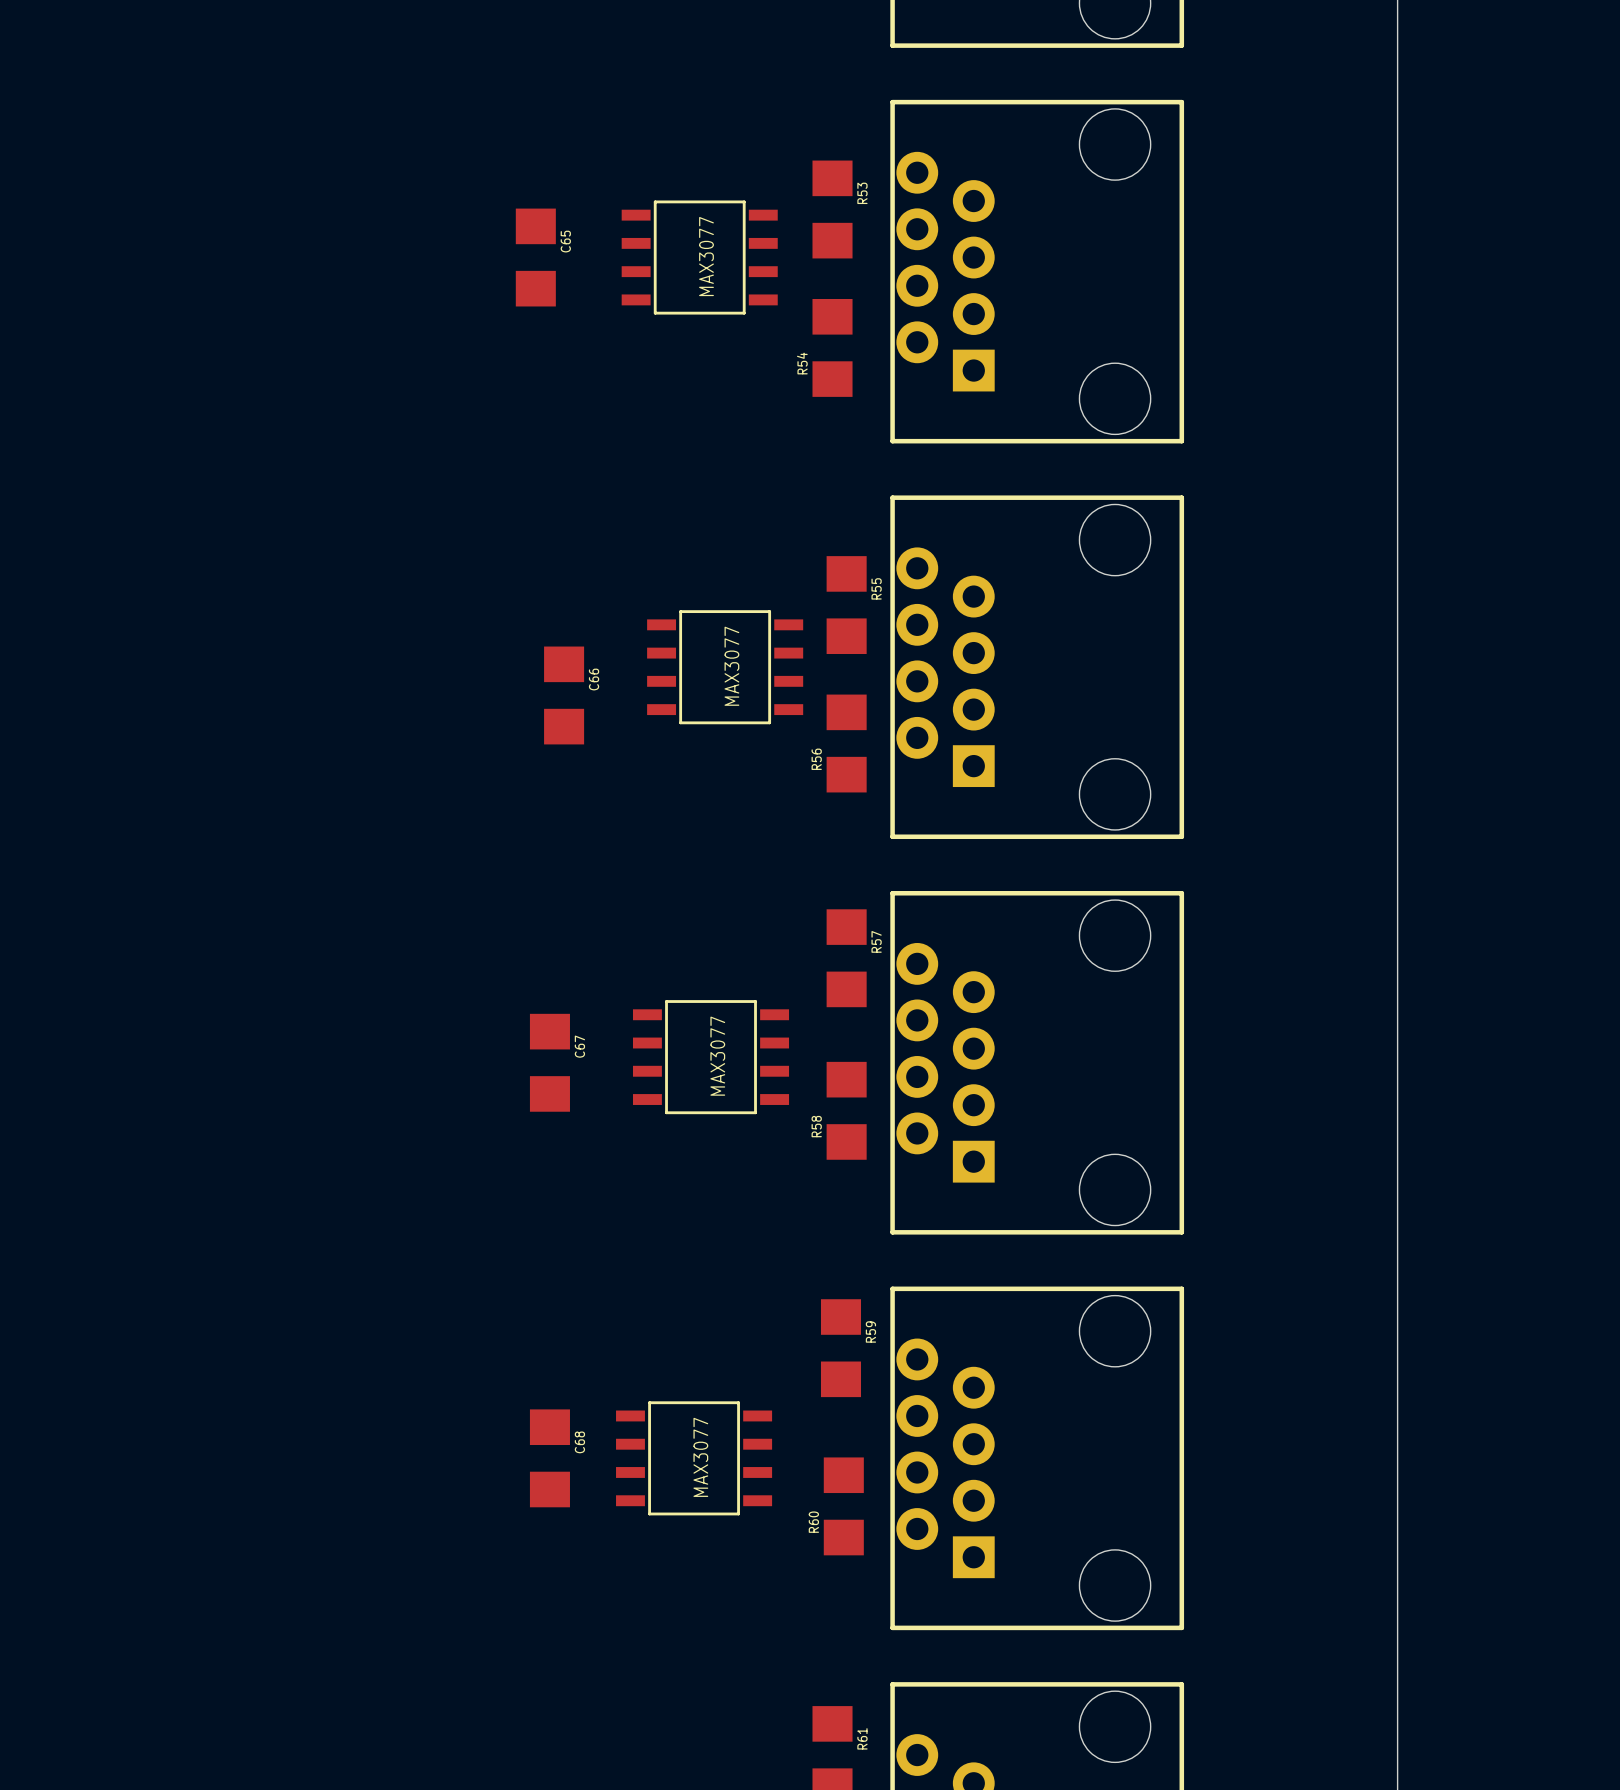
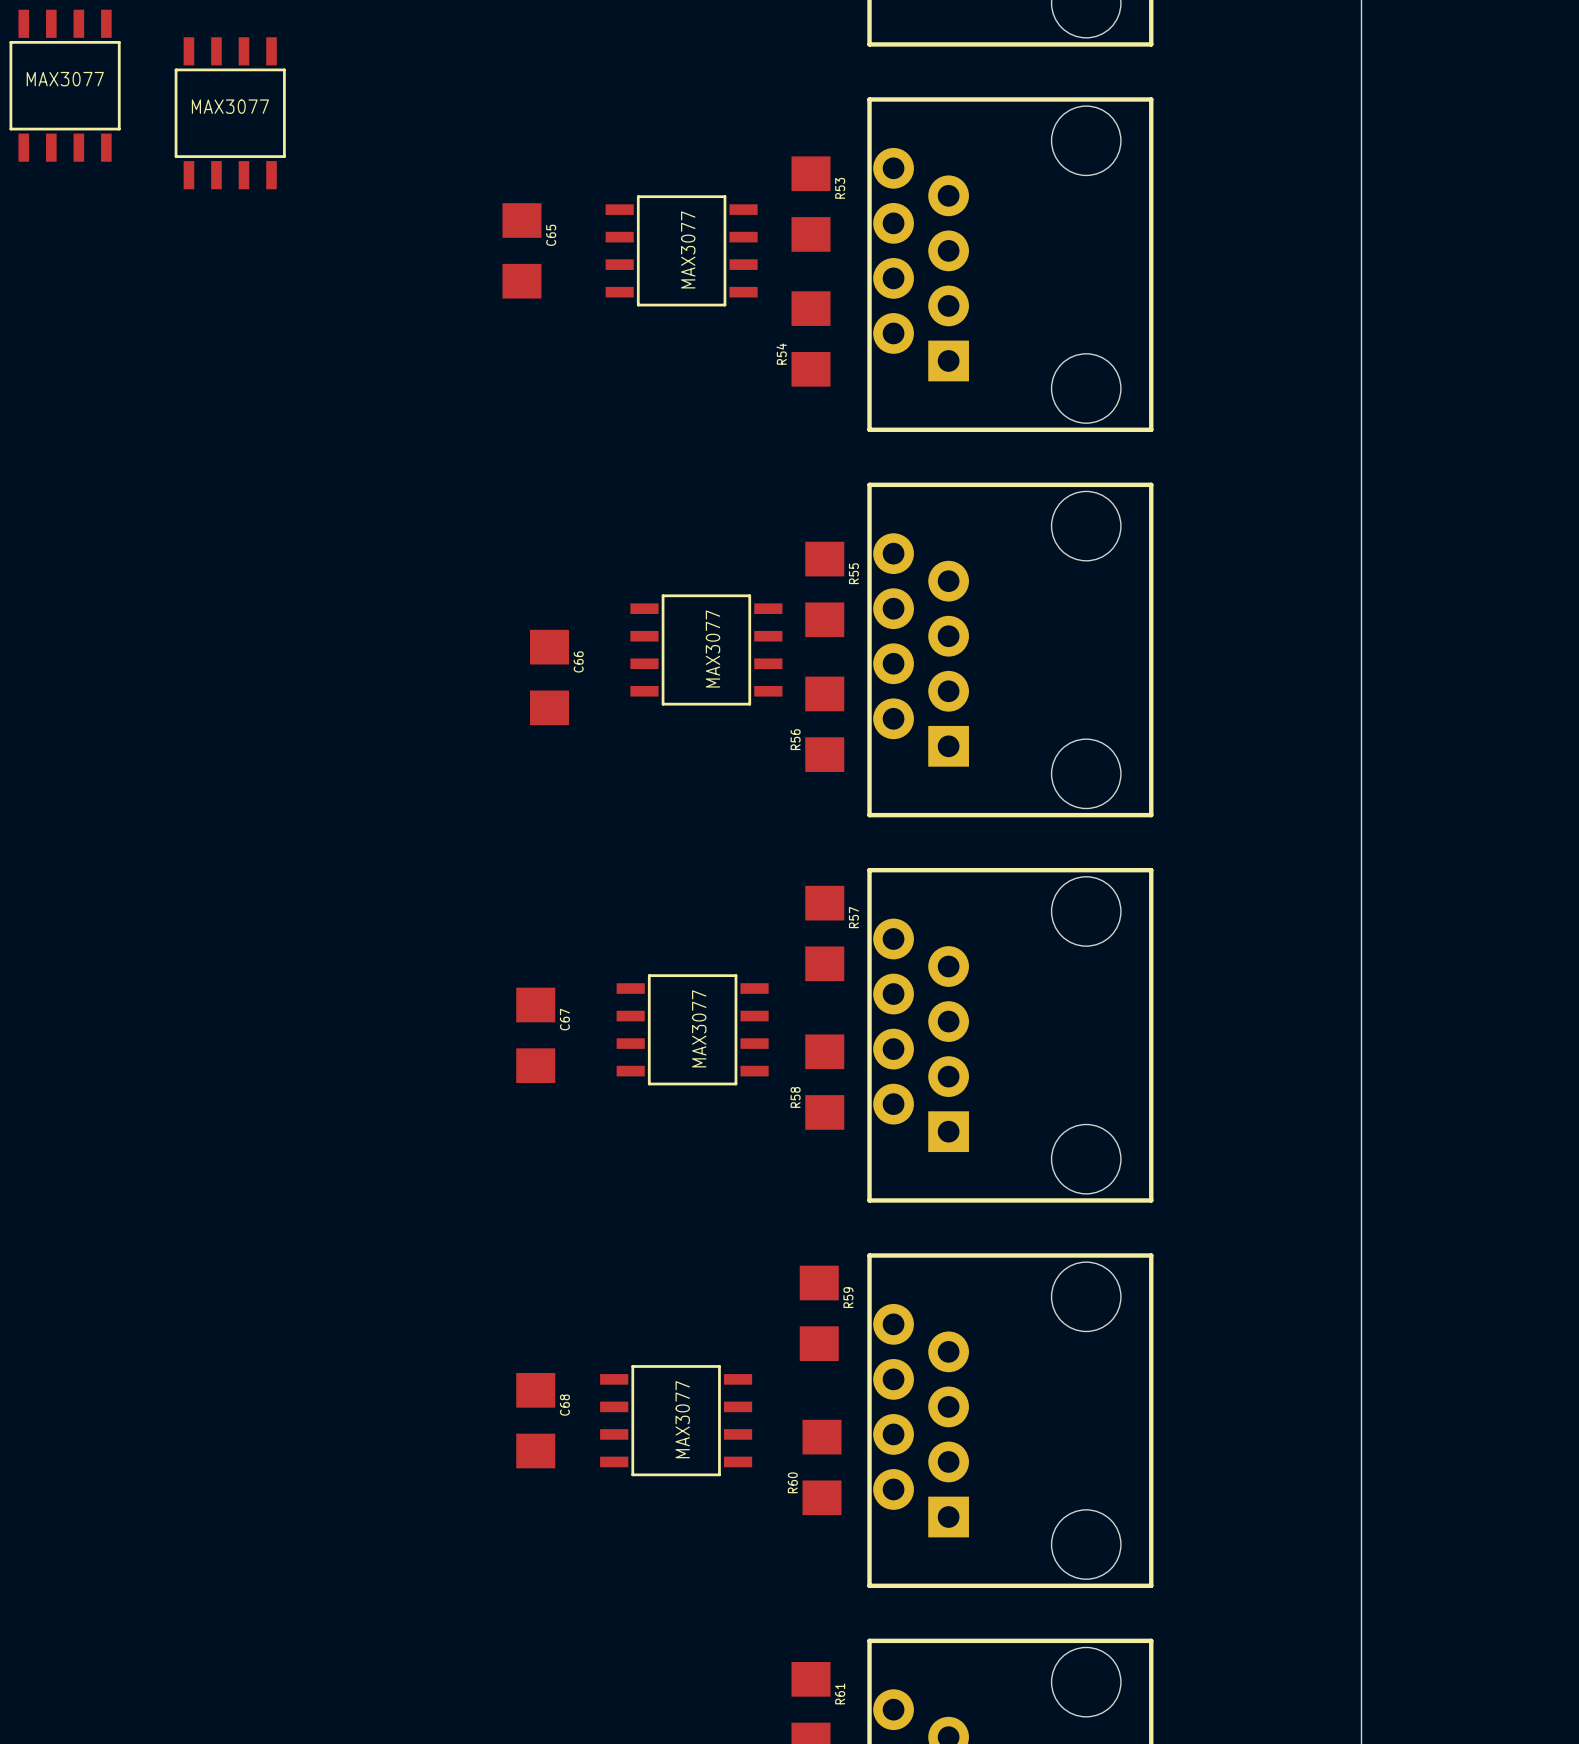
part: none -> (65, 85)
part: none -> (230, 113)

